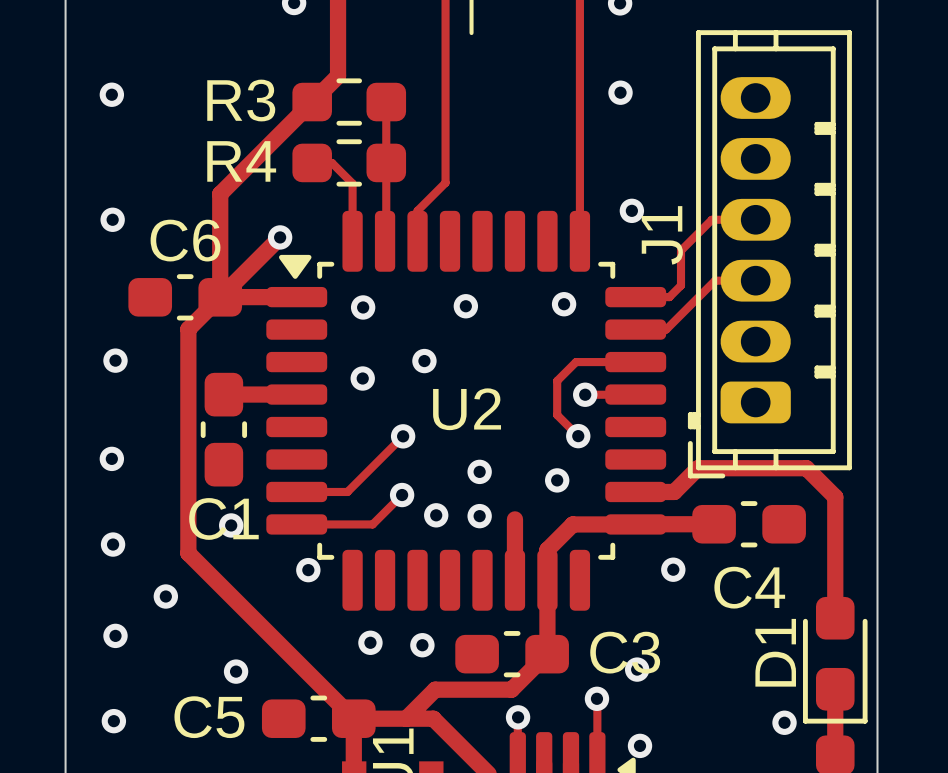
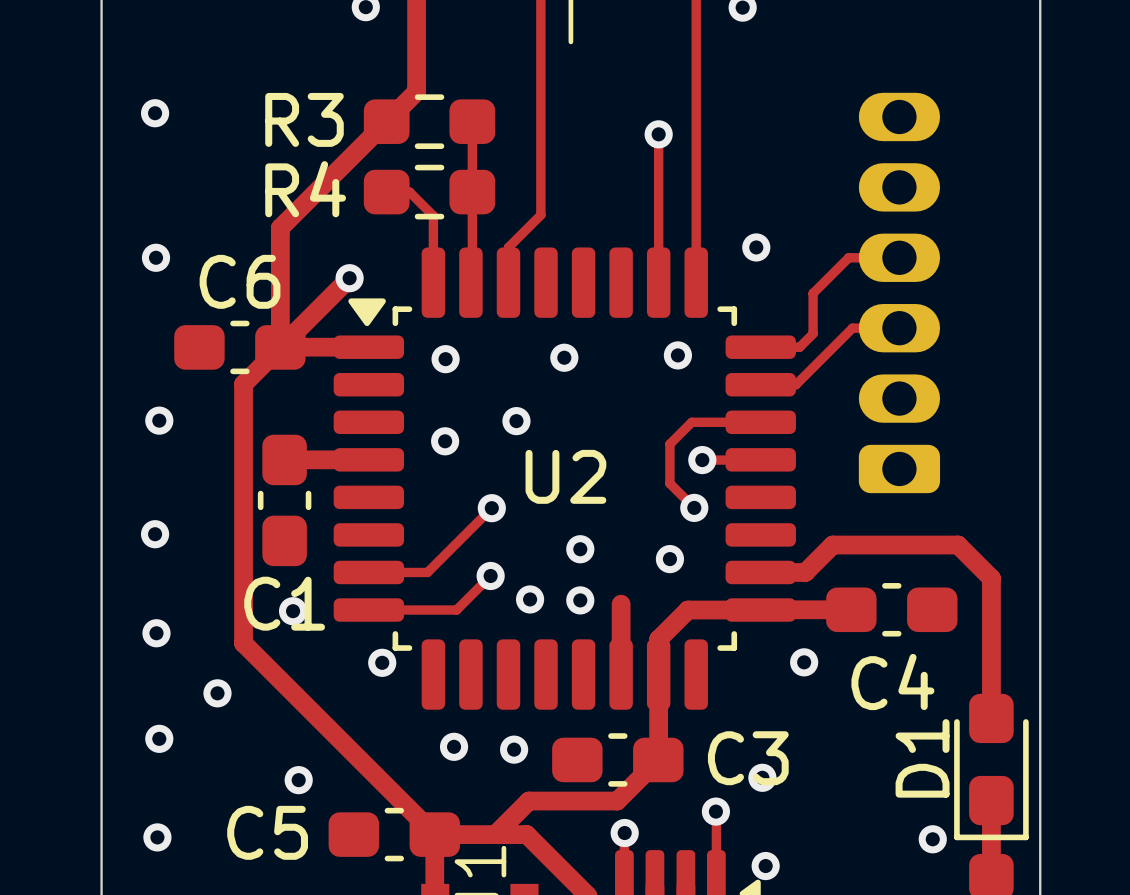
via position: (620, 92) -> (658, 134)
track: none -> (658, 134) (658, 282)
J1 side: top (769, 254) -> bottom (899, 292)

